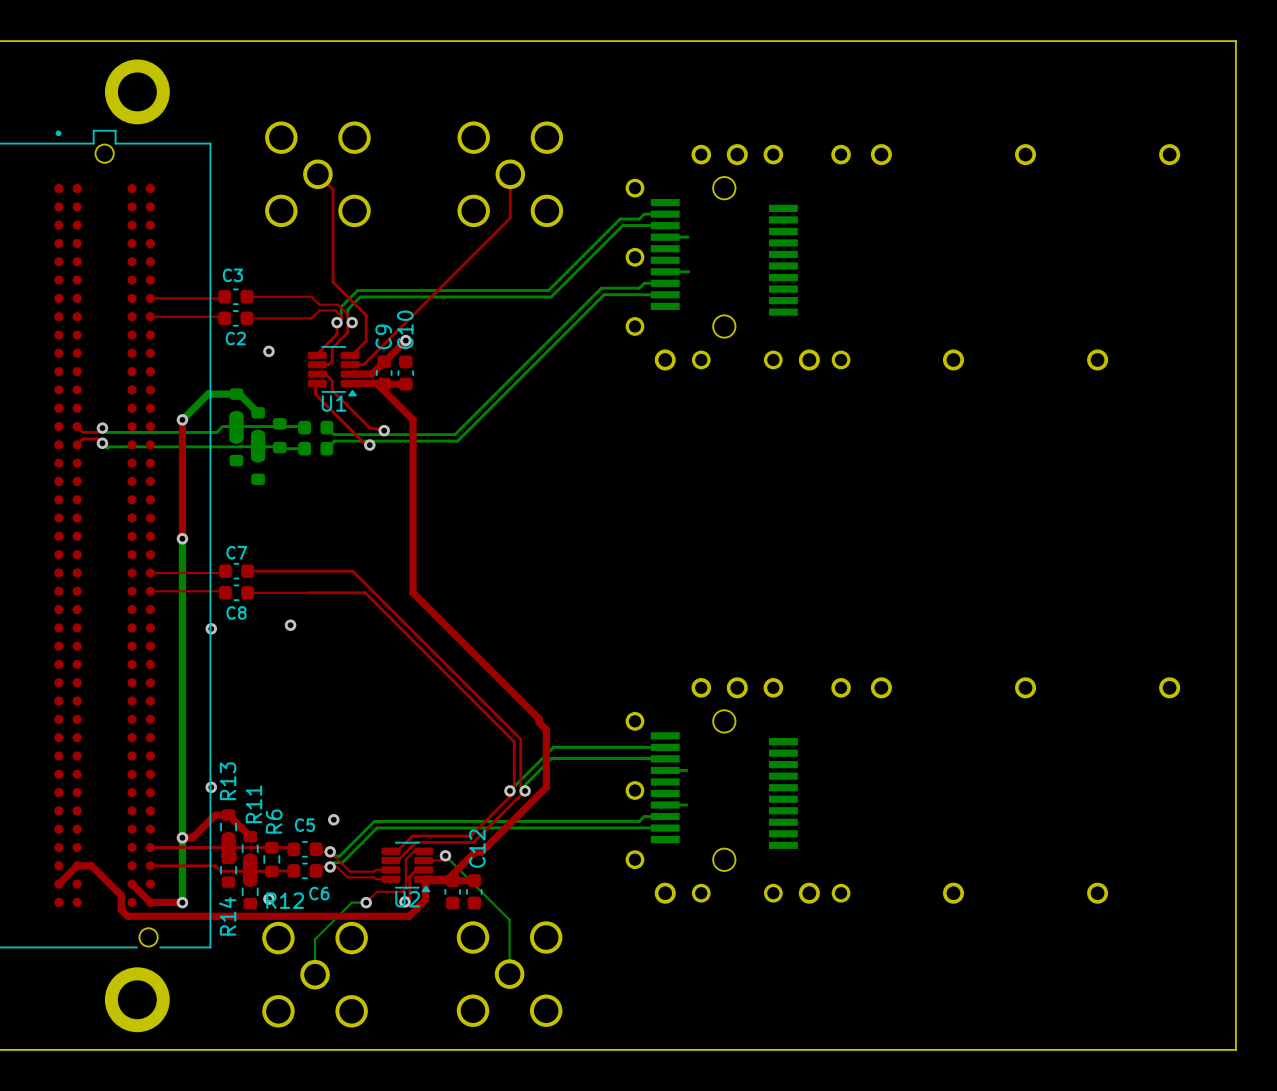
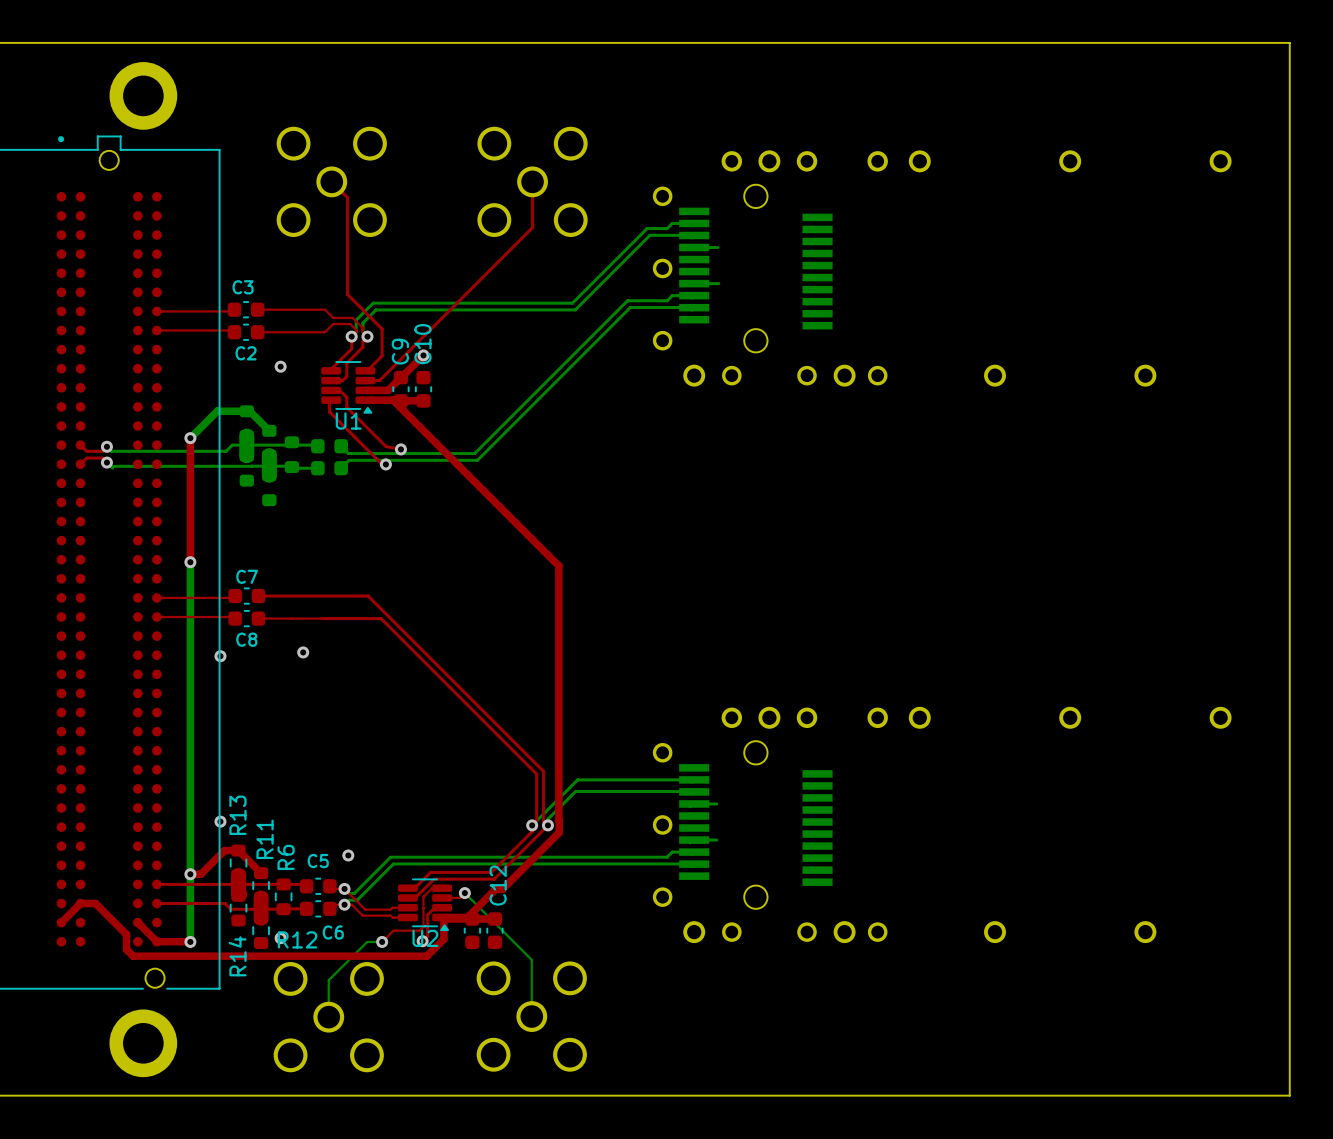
top track: (413, 419) (413, 592) (539, 718) (539, 722) (546, 729) (546, 787) (535, 797) -> (431, 438) (558, 565) (559, 832)

